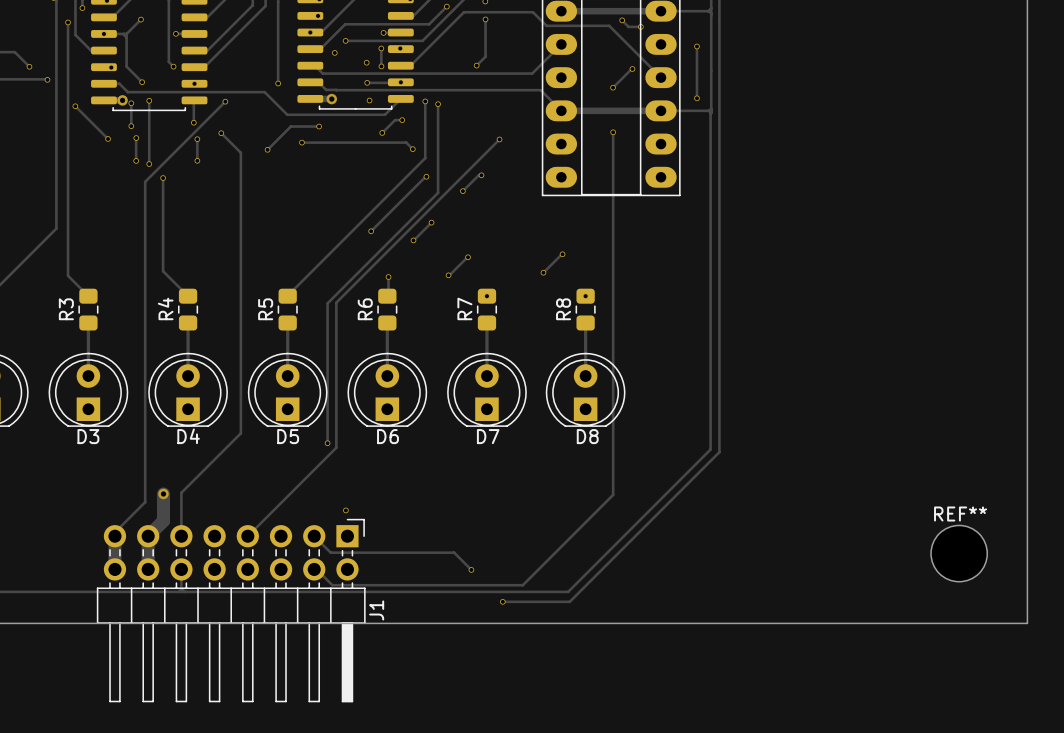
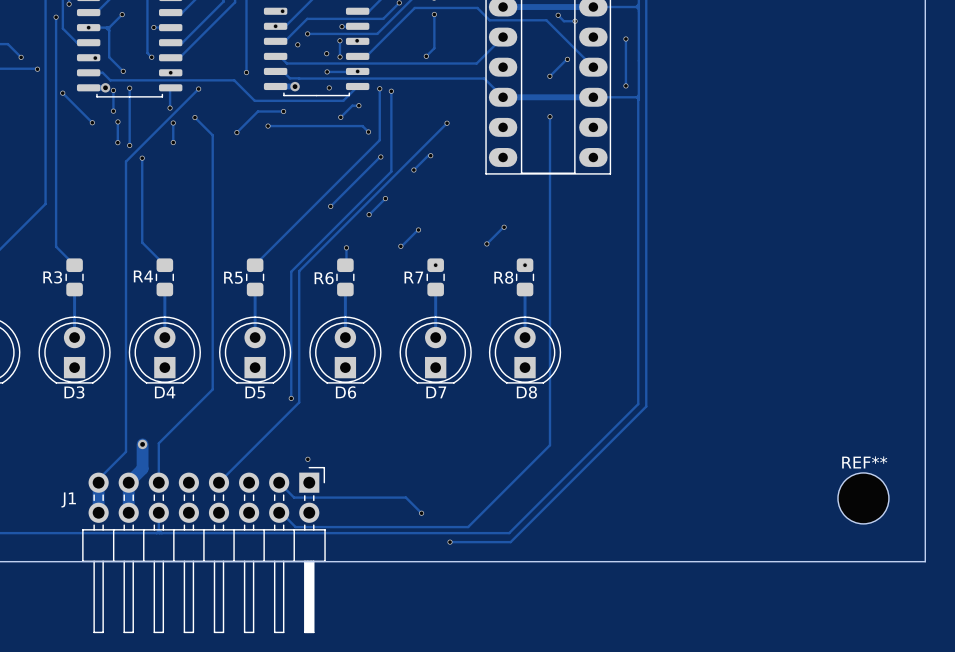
R4 name rotation: 0° (165, 308) -> 90° clockwise (143, 276)
R7 name rotation: 0° (464, 308) -> 90° clockwise (413, 277)
R3 name rotation: 0° (66, 309) -> 90° clockwise (52, 277)
R5 name rotation: 0° (265, 309) -> 90° clockwise (233, 277)
R6 name rotation: 0° (365, 309) -> 90° clockwise (324, 278)
R8 name rotation: 0° (563, 309) -> 90° clockwise (503, 277)
J1 name rotation: 0° (376, 610) -> 90° clockwise (68, 499)
J1 name position: J1 (376, 610) -> J1 (68, 499)

